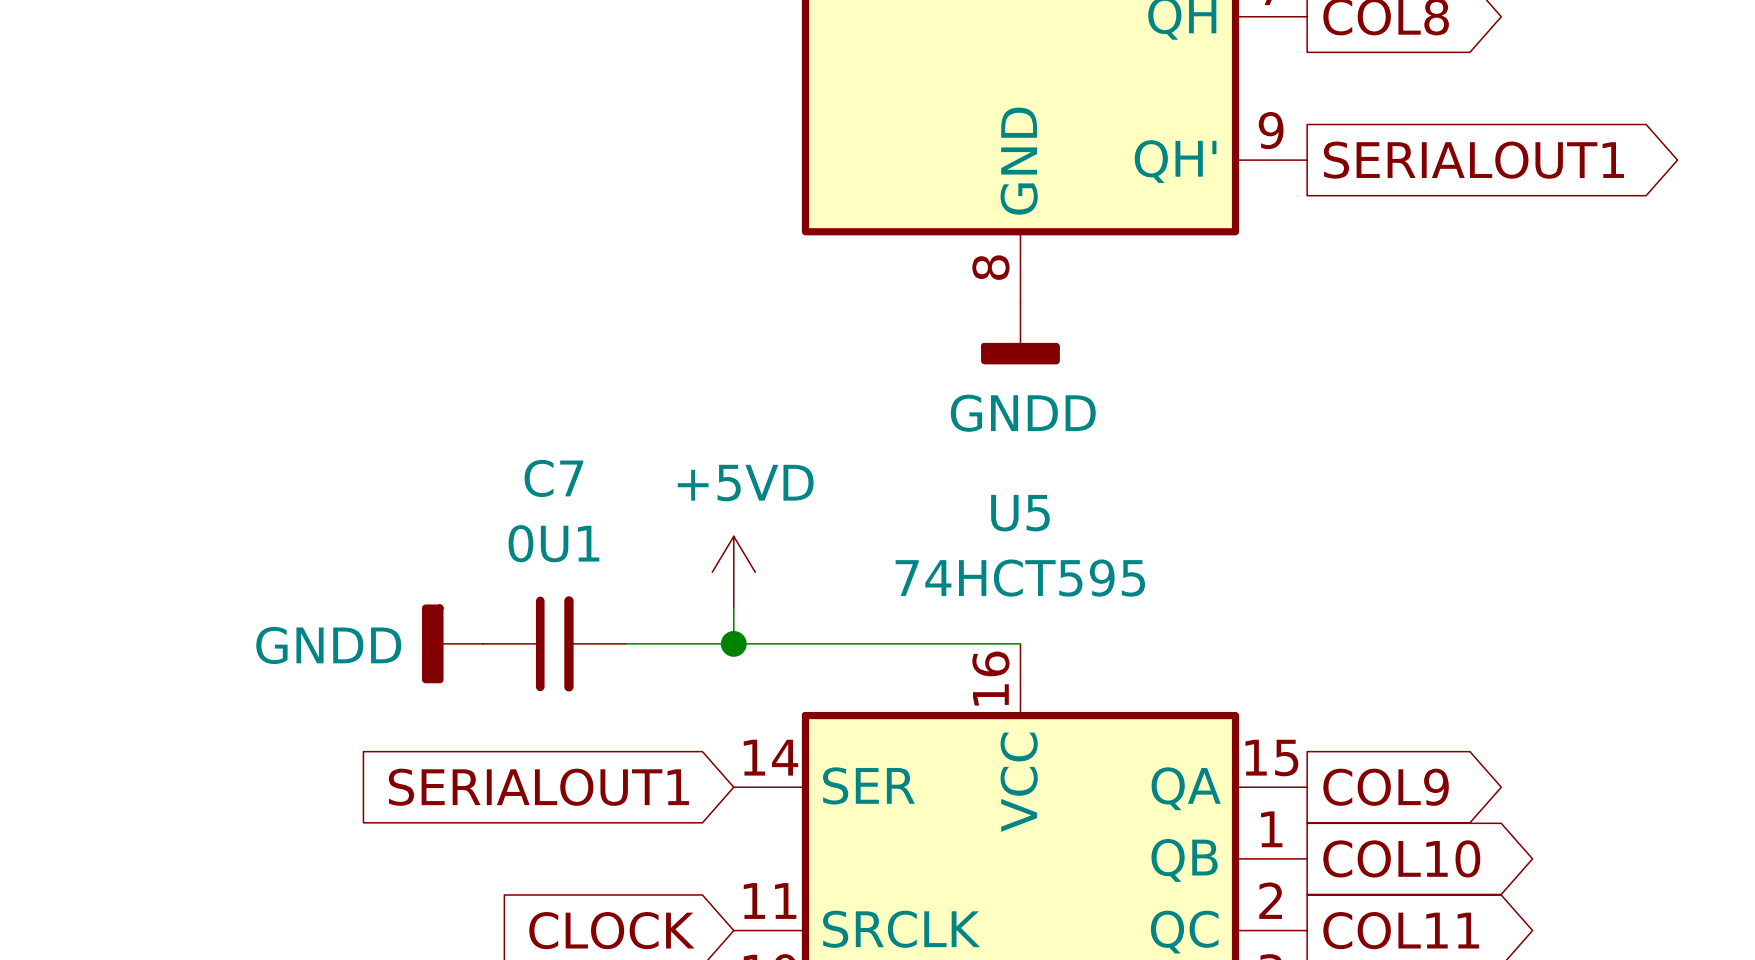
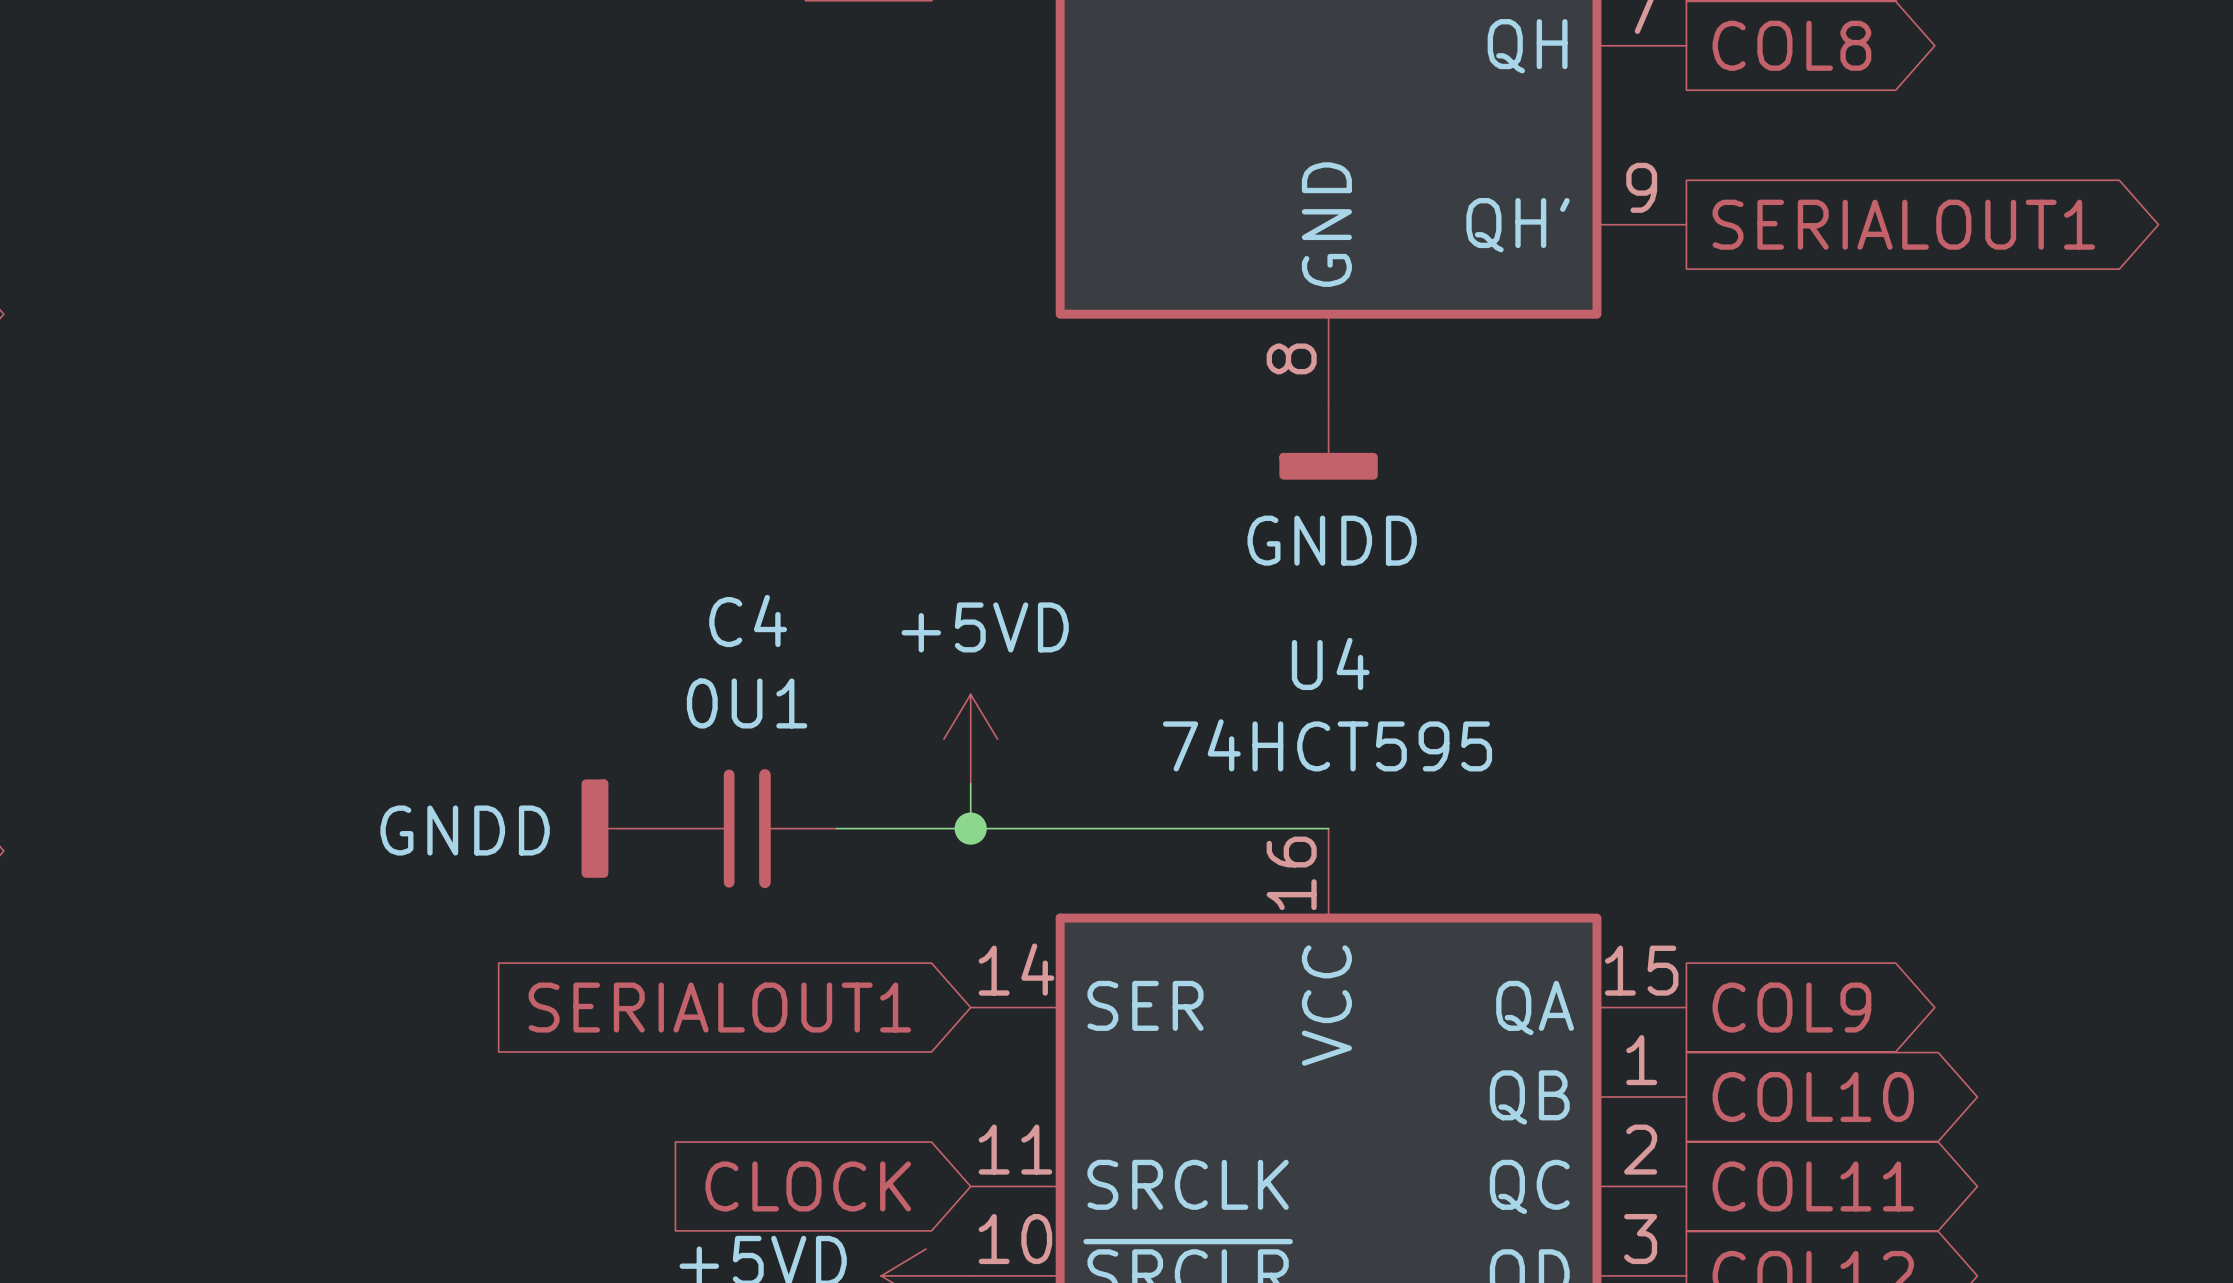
C7 name: C7 (553, 478) -> C4 (748, 620)
U5 name: U5 (1020, 513) -> U4 (1330, 663)

